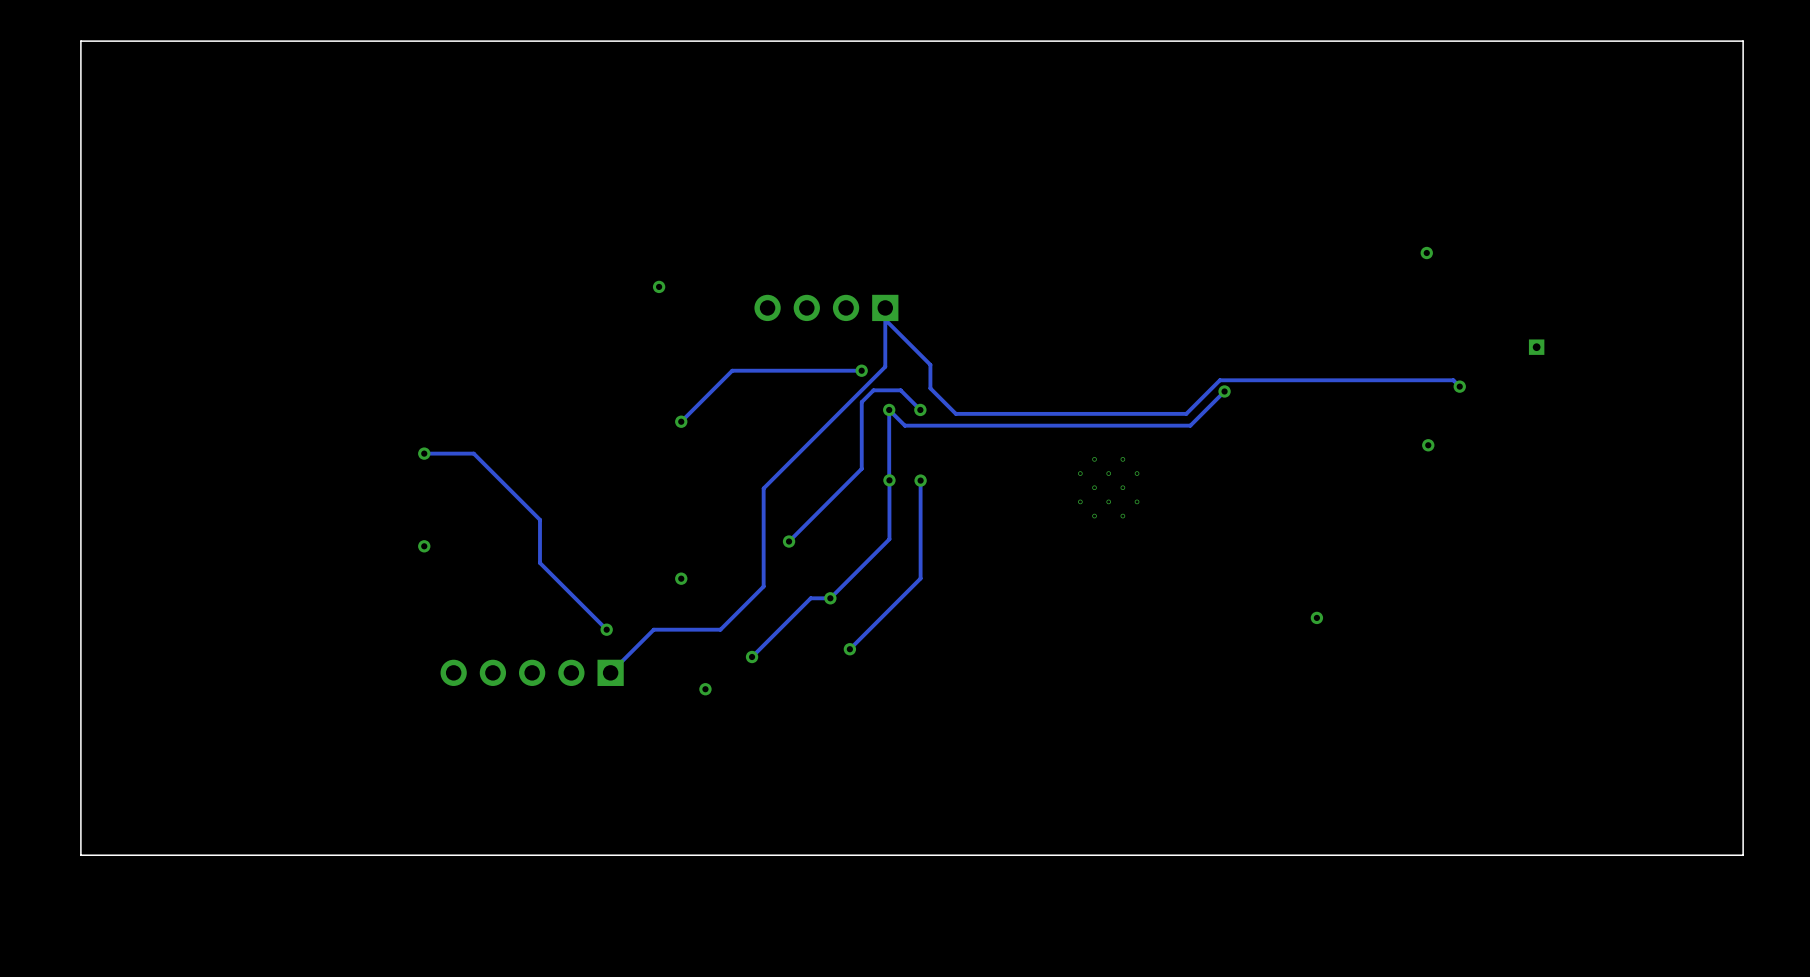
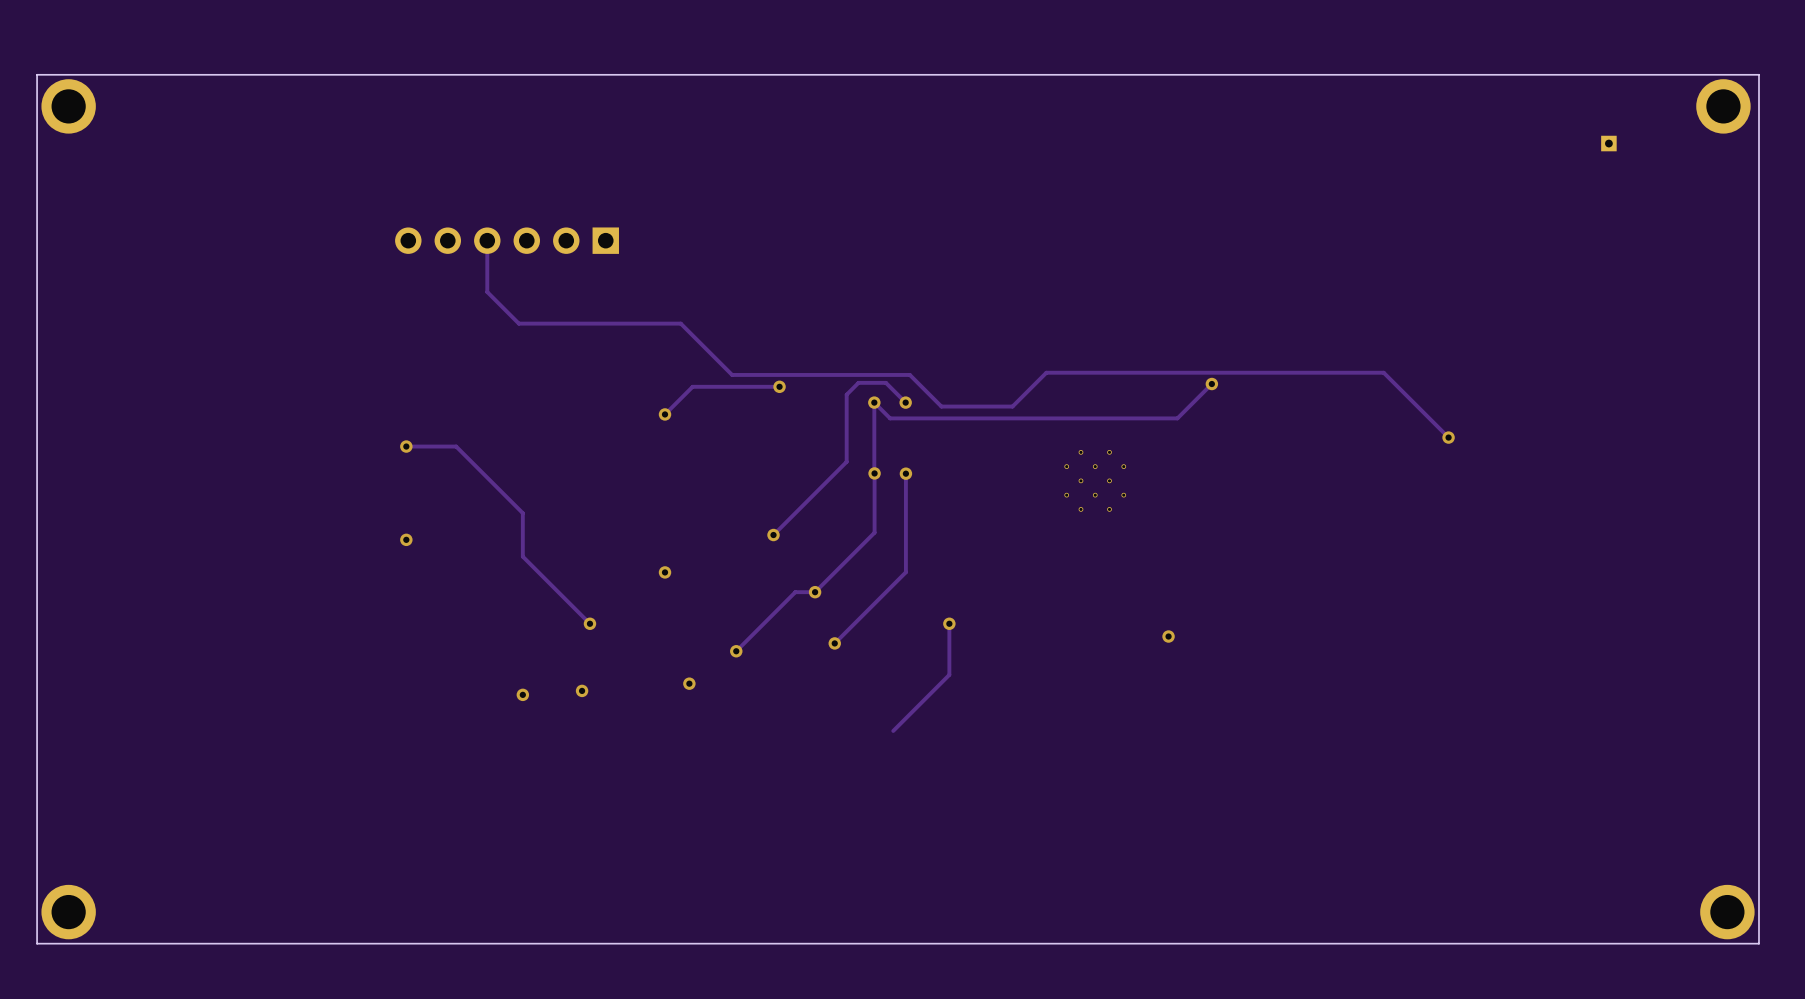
board edge: (1743, 41) (1743, 855) (80, 855) (80, 41) (1743, 41) -> (1758, 74) (1758, 943) (37, 943) (37, 74) (1758, 74)
part: none -> (68, 106)
part: none -> (1723, 106)
part: none -> (507, 240)
via: (1426, 253) -> none
via: (659, 286) -> none
part: (826, 307) -> none
track: (885, 307) (885, 366) (763, 488) (763, 586) (720, 629) (653, 629) (610, 672) -> none
track: (885, 319) (930, 364) (930, 388) -> (487, 240) (487, 292) (518, 323) (680, 323) (732, 374) (909, 374) (915, 380)
part position: (1536, 347) -> (1608, 143)
track: (861, 370) (732, 370) (708, 394) -> (779, 386) (692, 386)
via position: (861, 370) -> (779, 386)
track: (1219, 380) (1186, 413) (1026, 413) -> (1207, 372) (1046, 372) (1012, 406)
track: (1395, 380) (1453, 380) (1459, 386) -> (1383, 372) (1448, 437)
via: (1459, 386) -> none
via: none -> (1448, 437)
via: (1428, 445) -> none
via: (1316, 617) -> none
track: none -> (949, 623) (949, 674) (893, 730)
via: none -> (949, 623)
via: none -> (1168, 636)
part: (532, 672) -> none
via: none -> (582, 690)
via: none -> (522, 694)
part: none -> (68, 912)
part: none -> (1727, 912)

